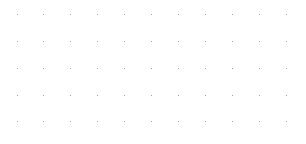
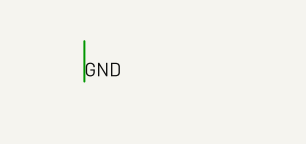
wire: none -> (84, 41) (84, 81)
label: none -> GND (102, 69)

